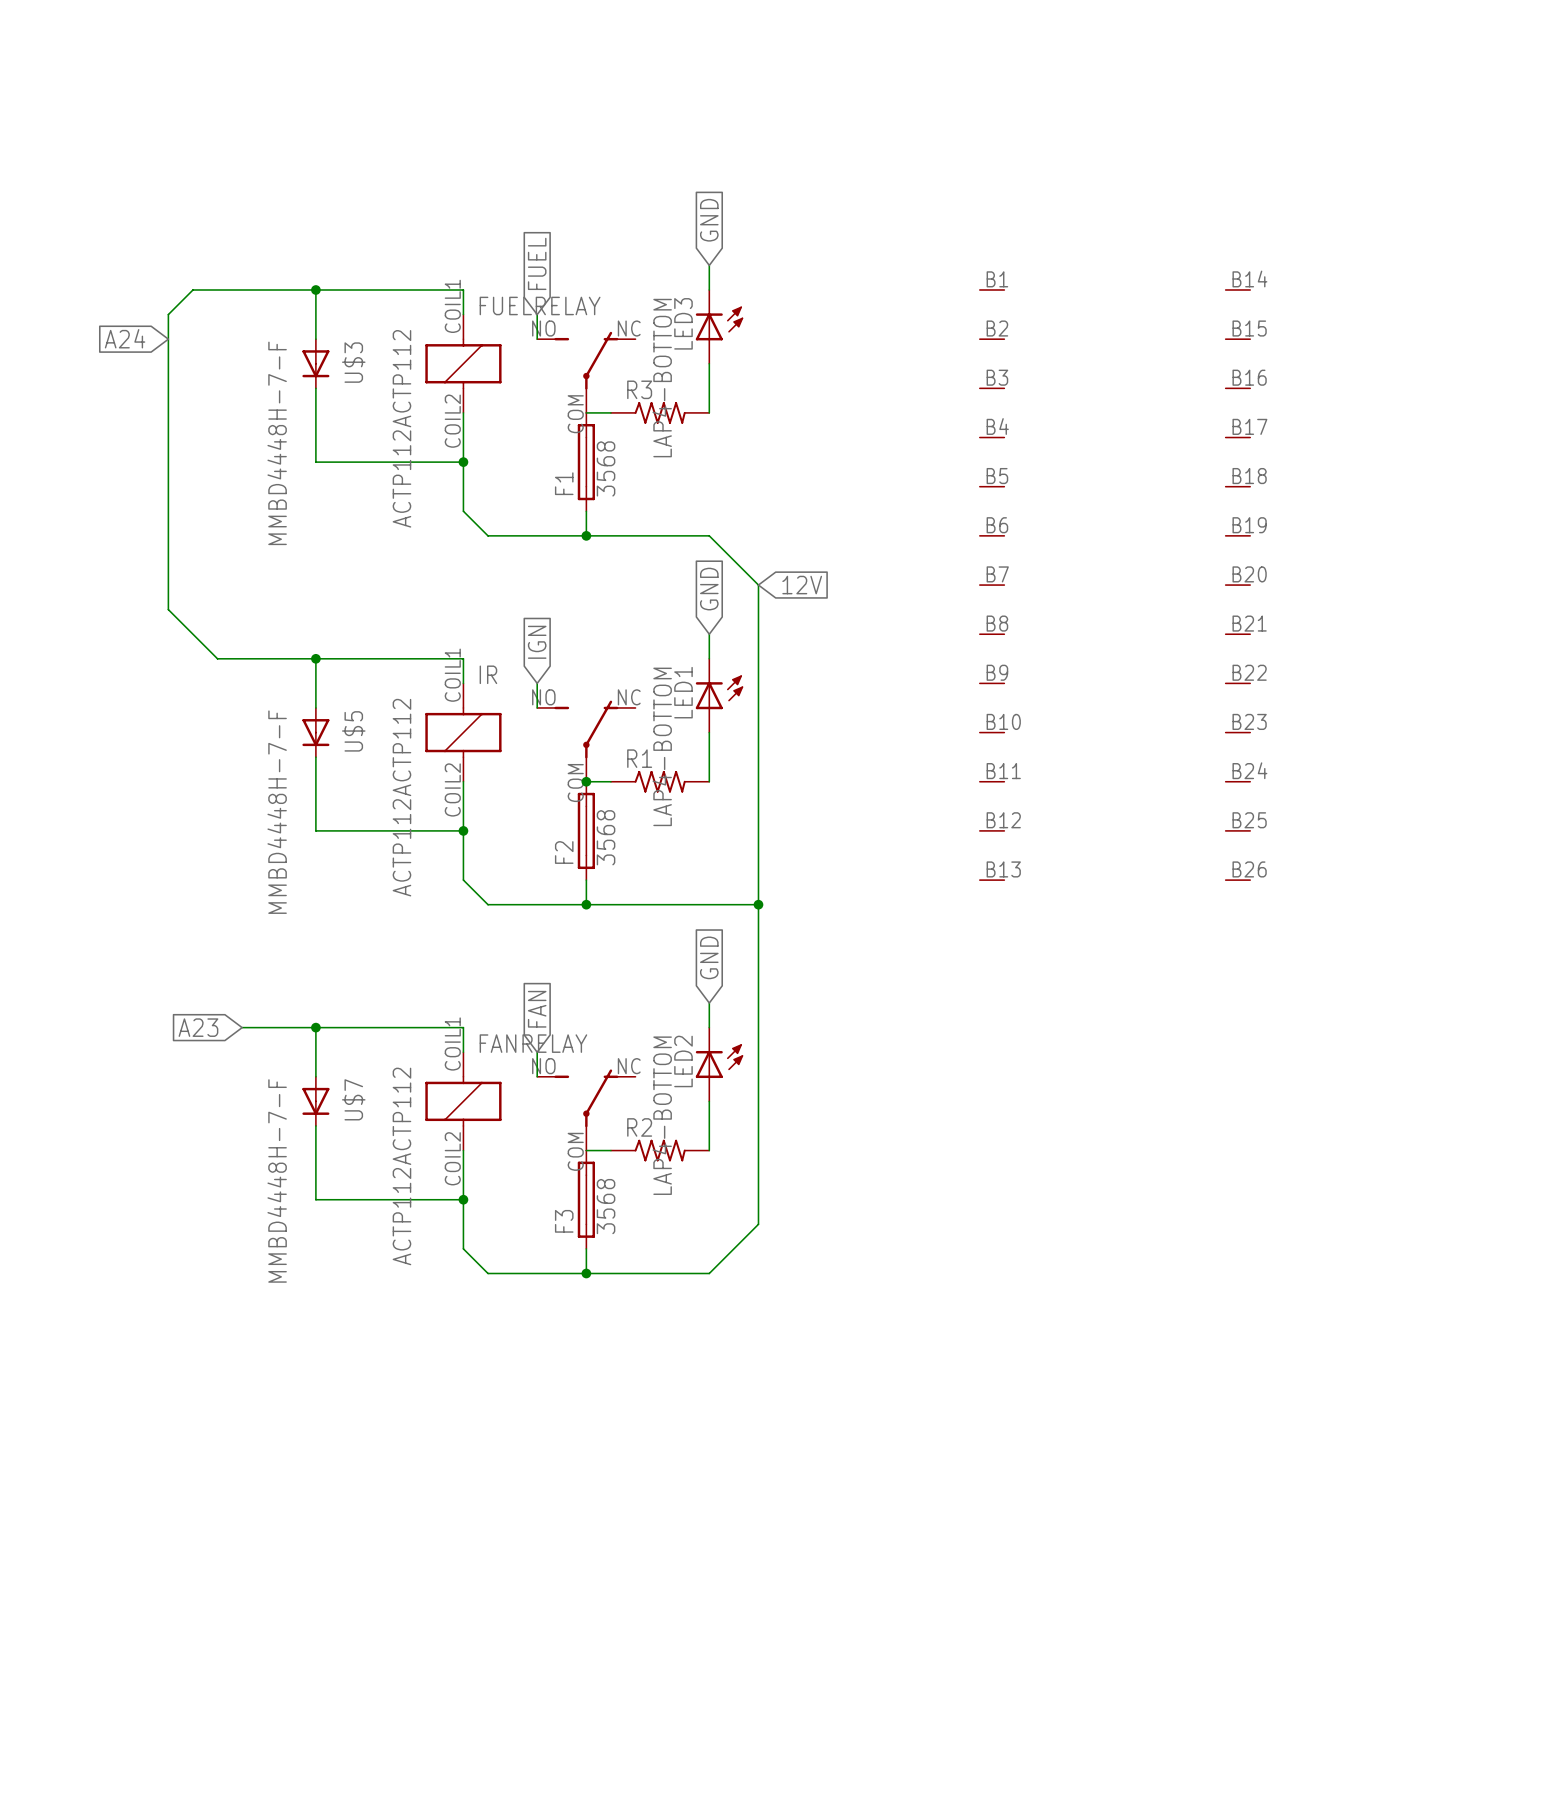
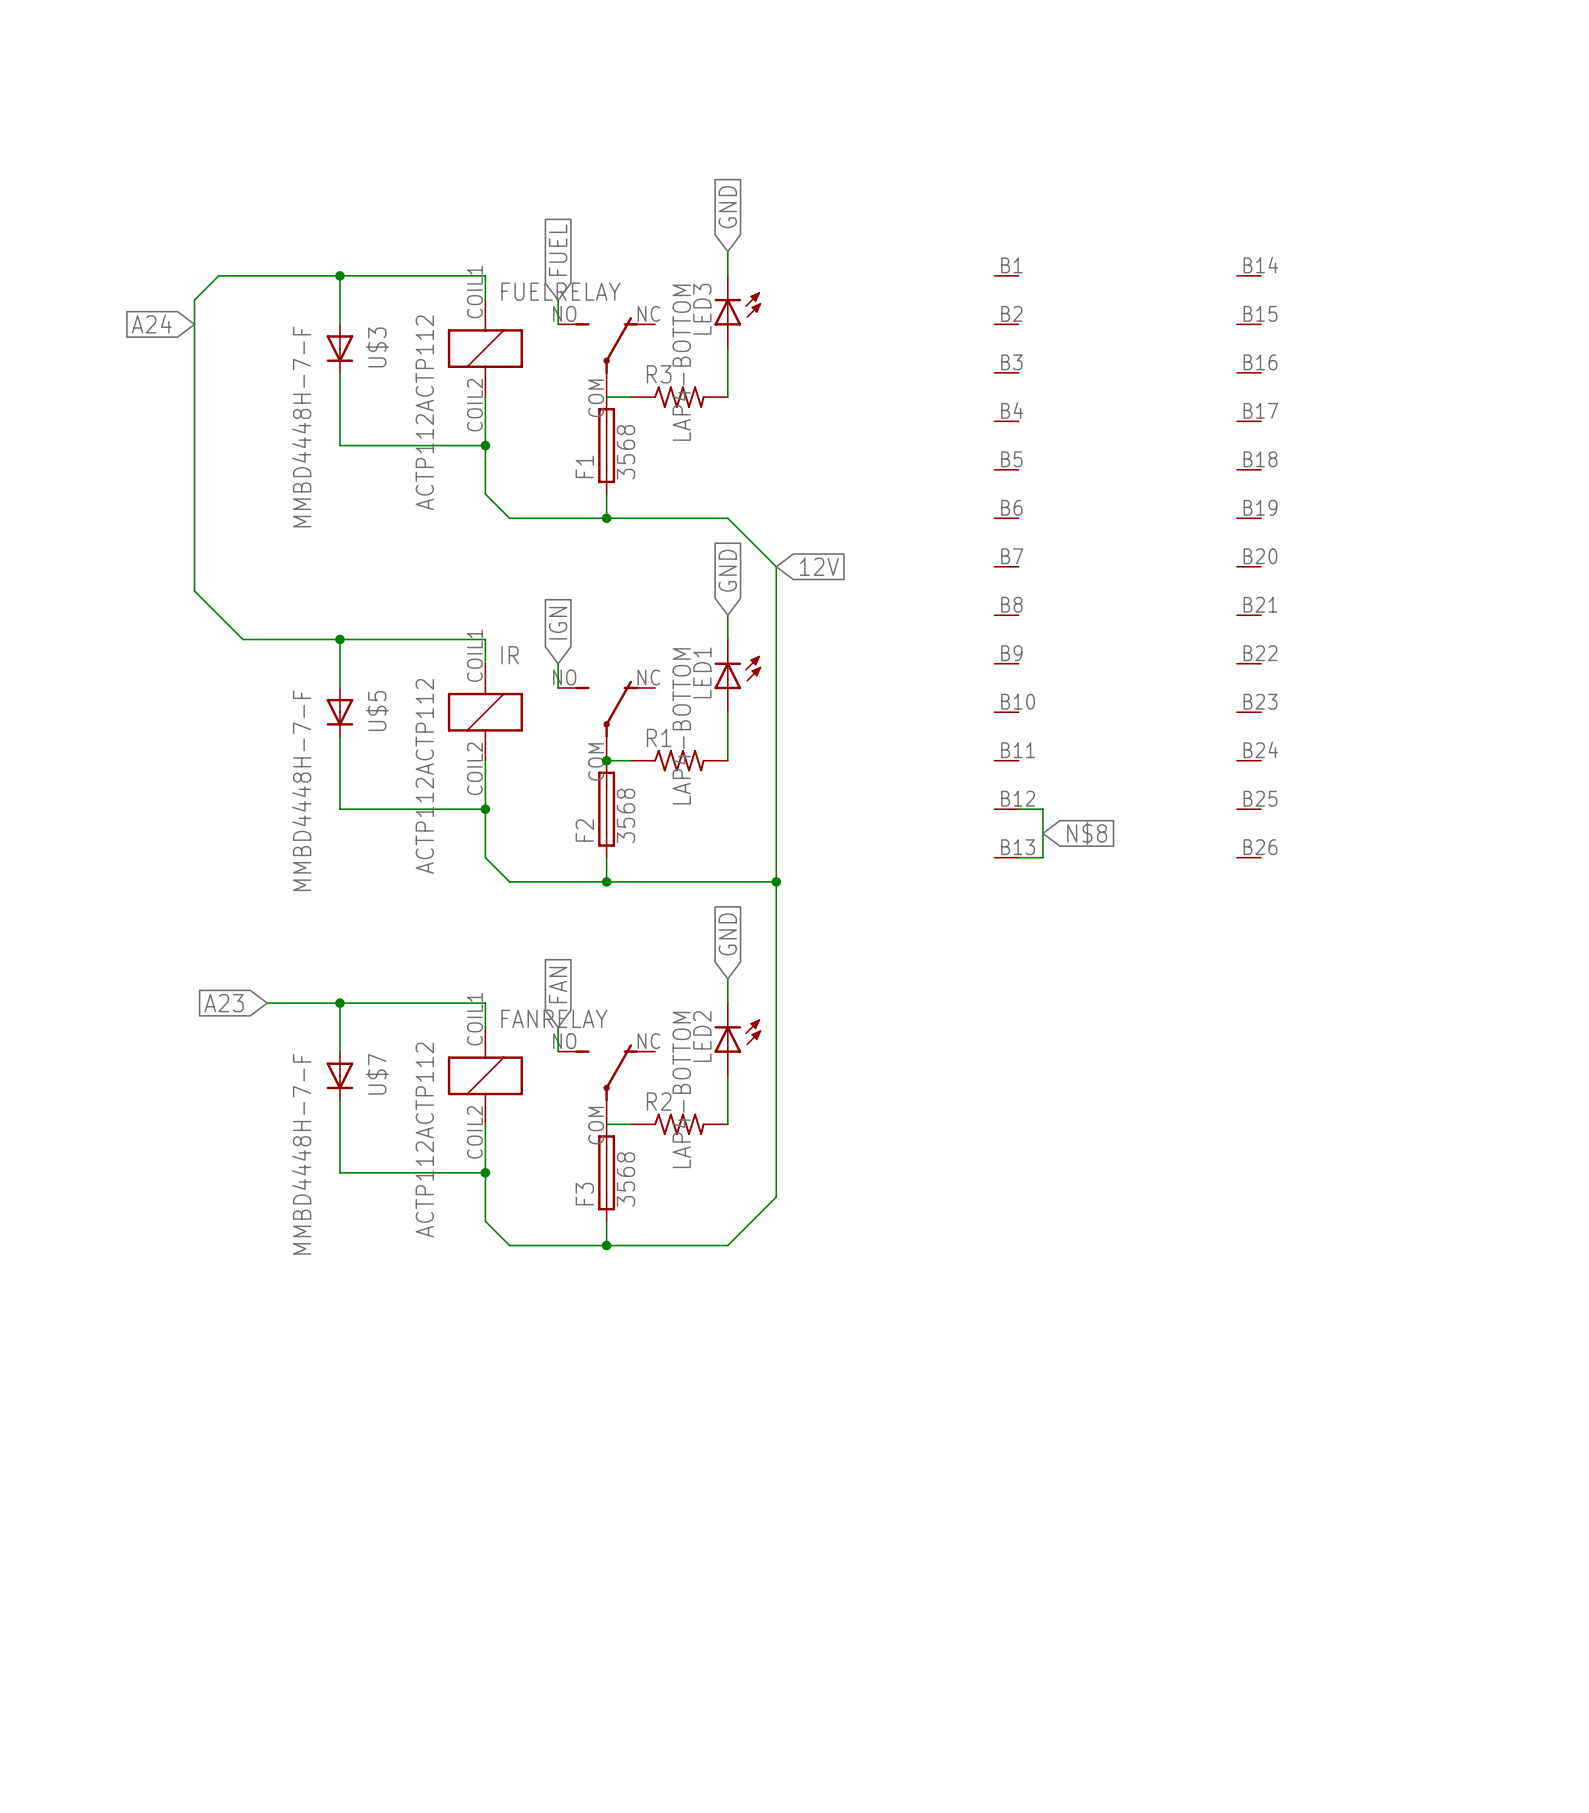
wire: none -> (1018, 809) (1042, 809) (1042, 857) (1018, 857)
global label: none -> N$8 (1087, 833)

